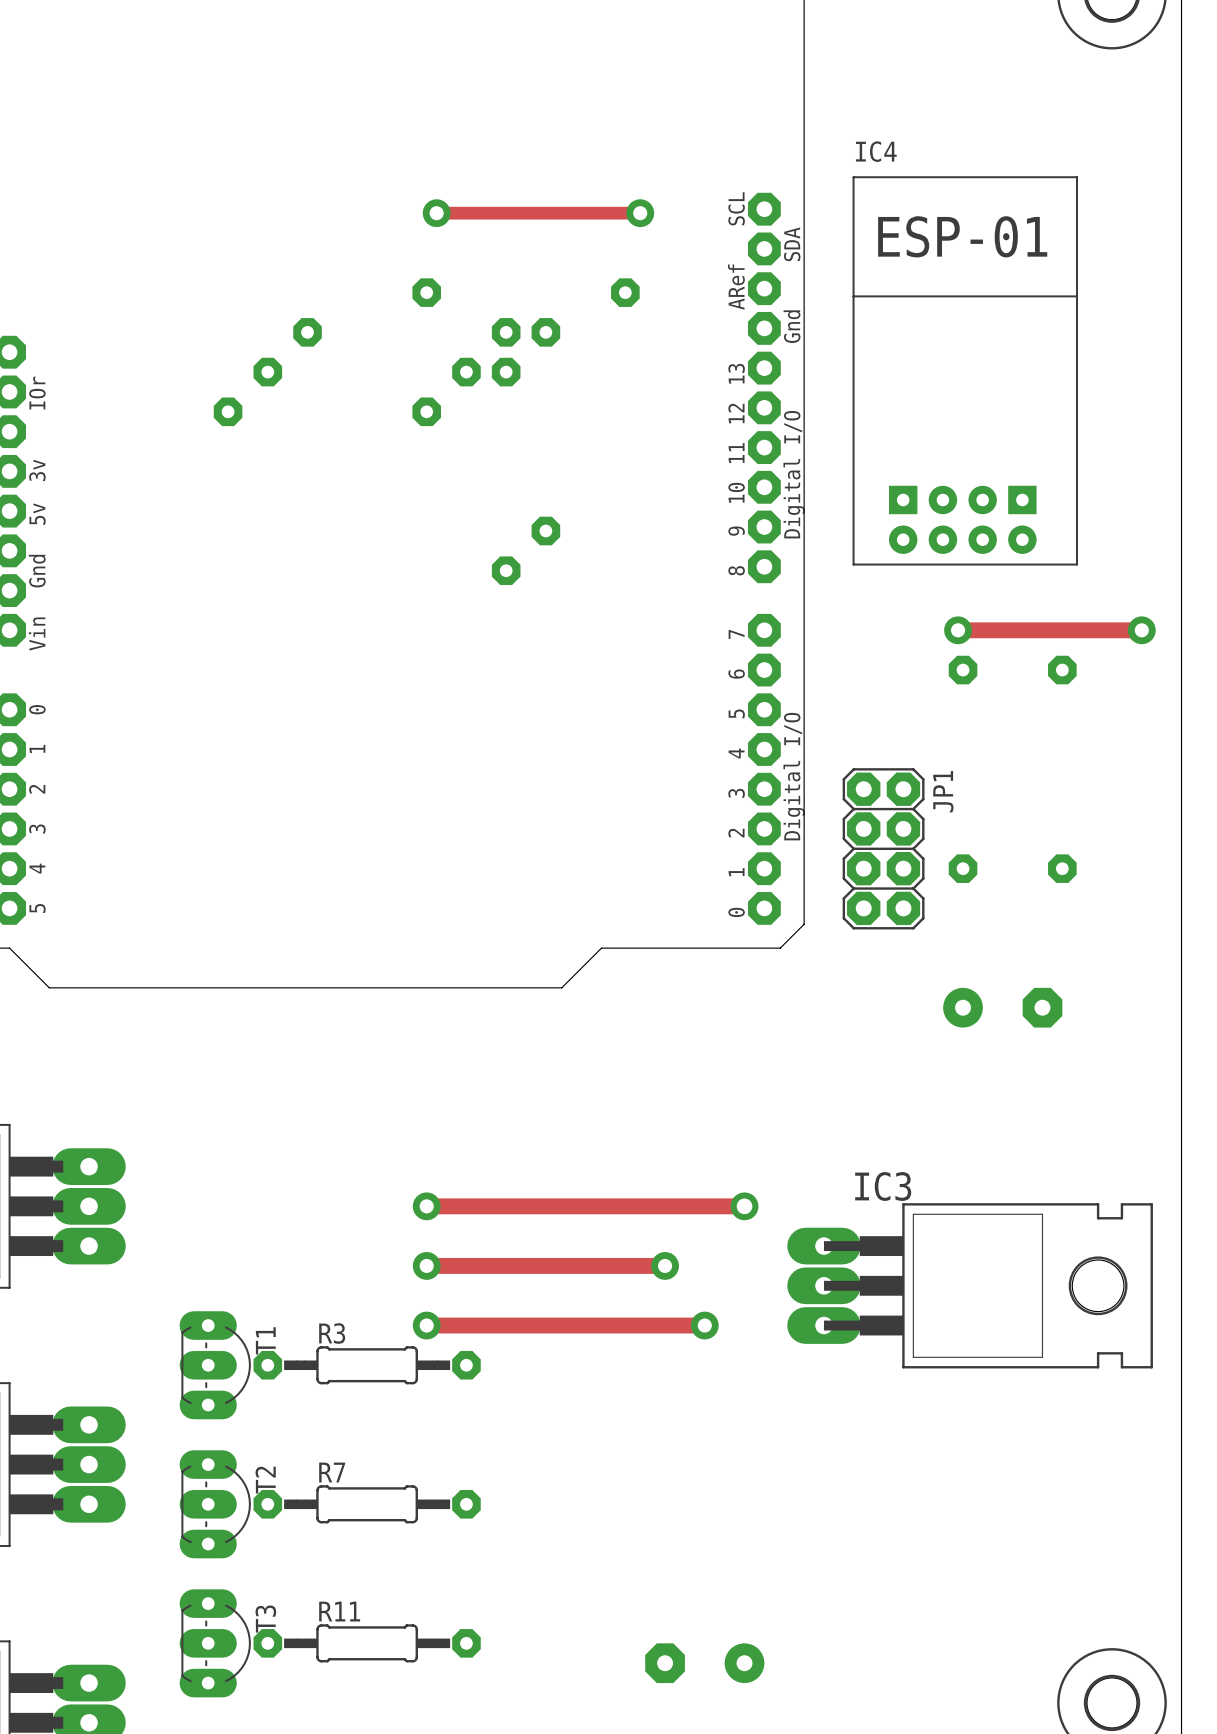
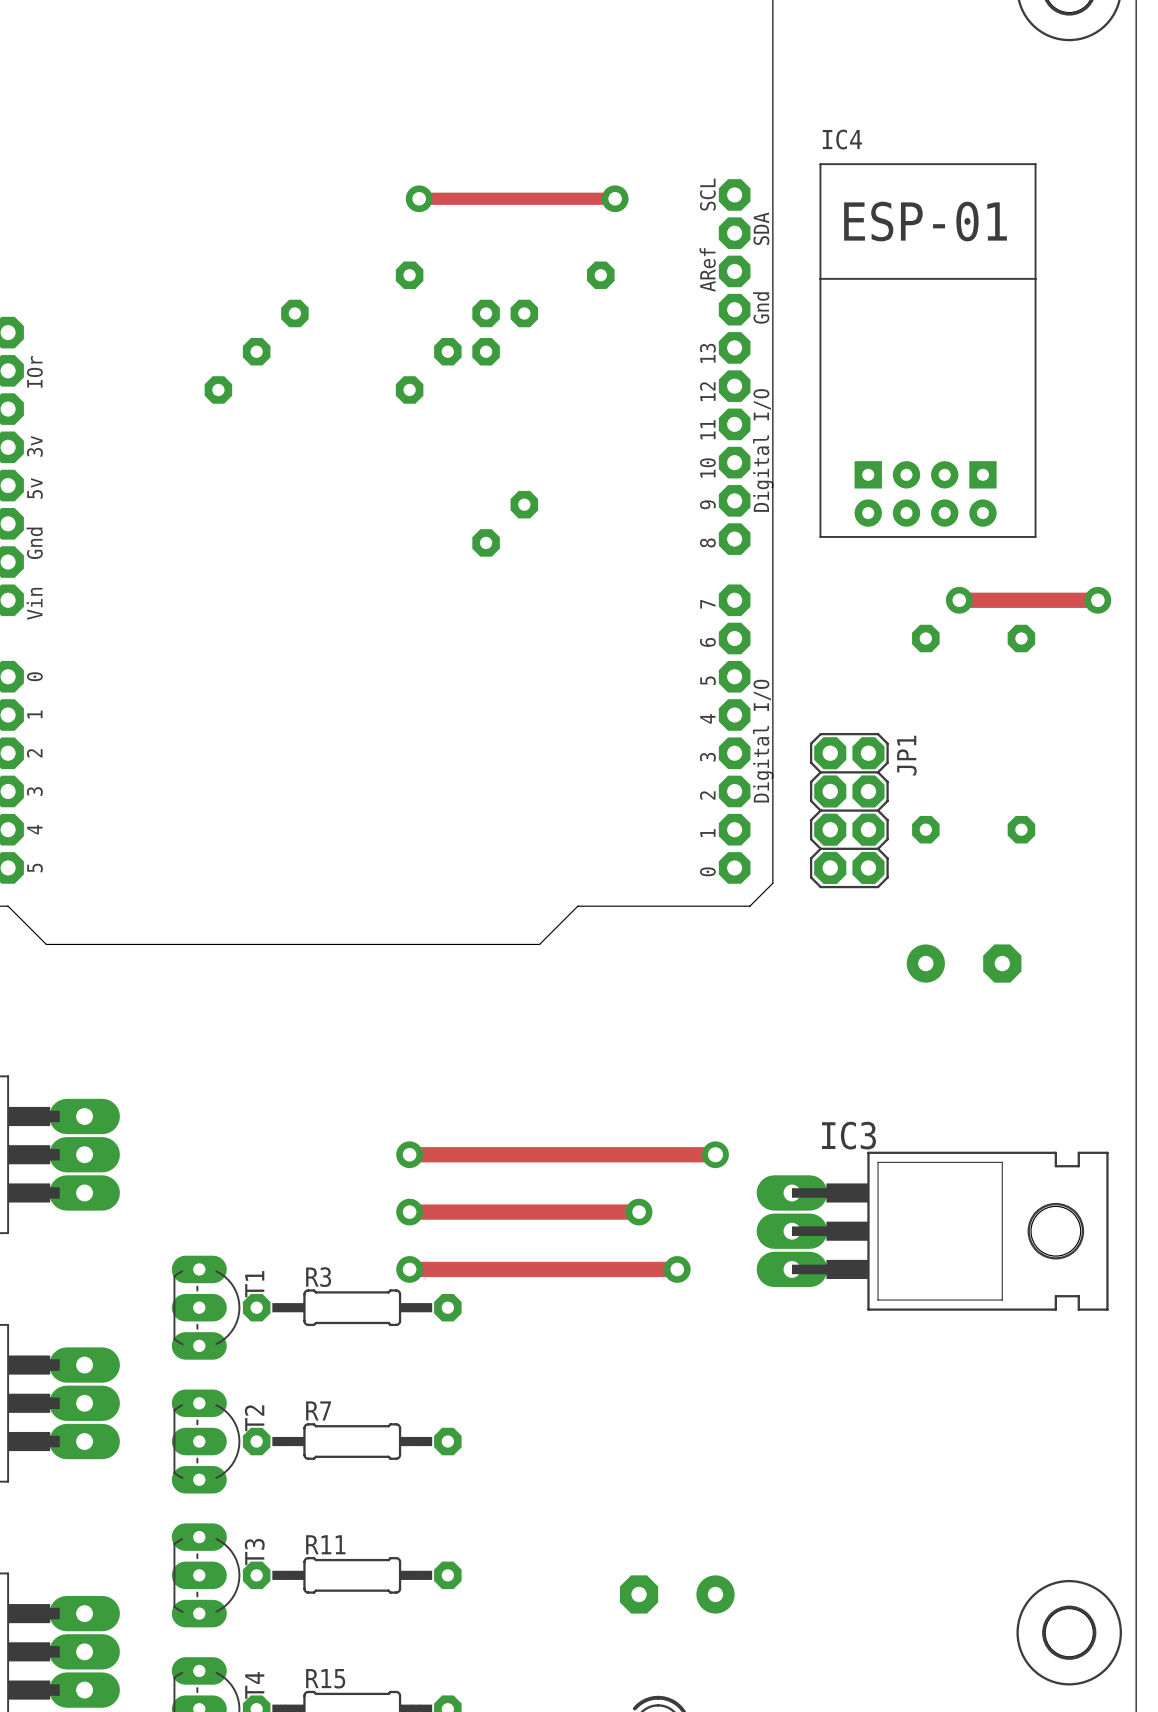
track: (958, 630) (997, 630) -> none
via position: (958, 630) -> (959, 600)

